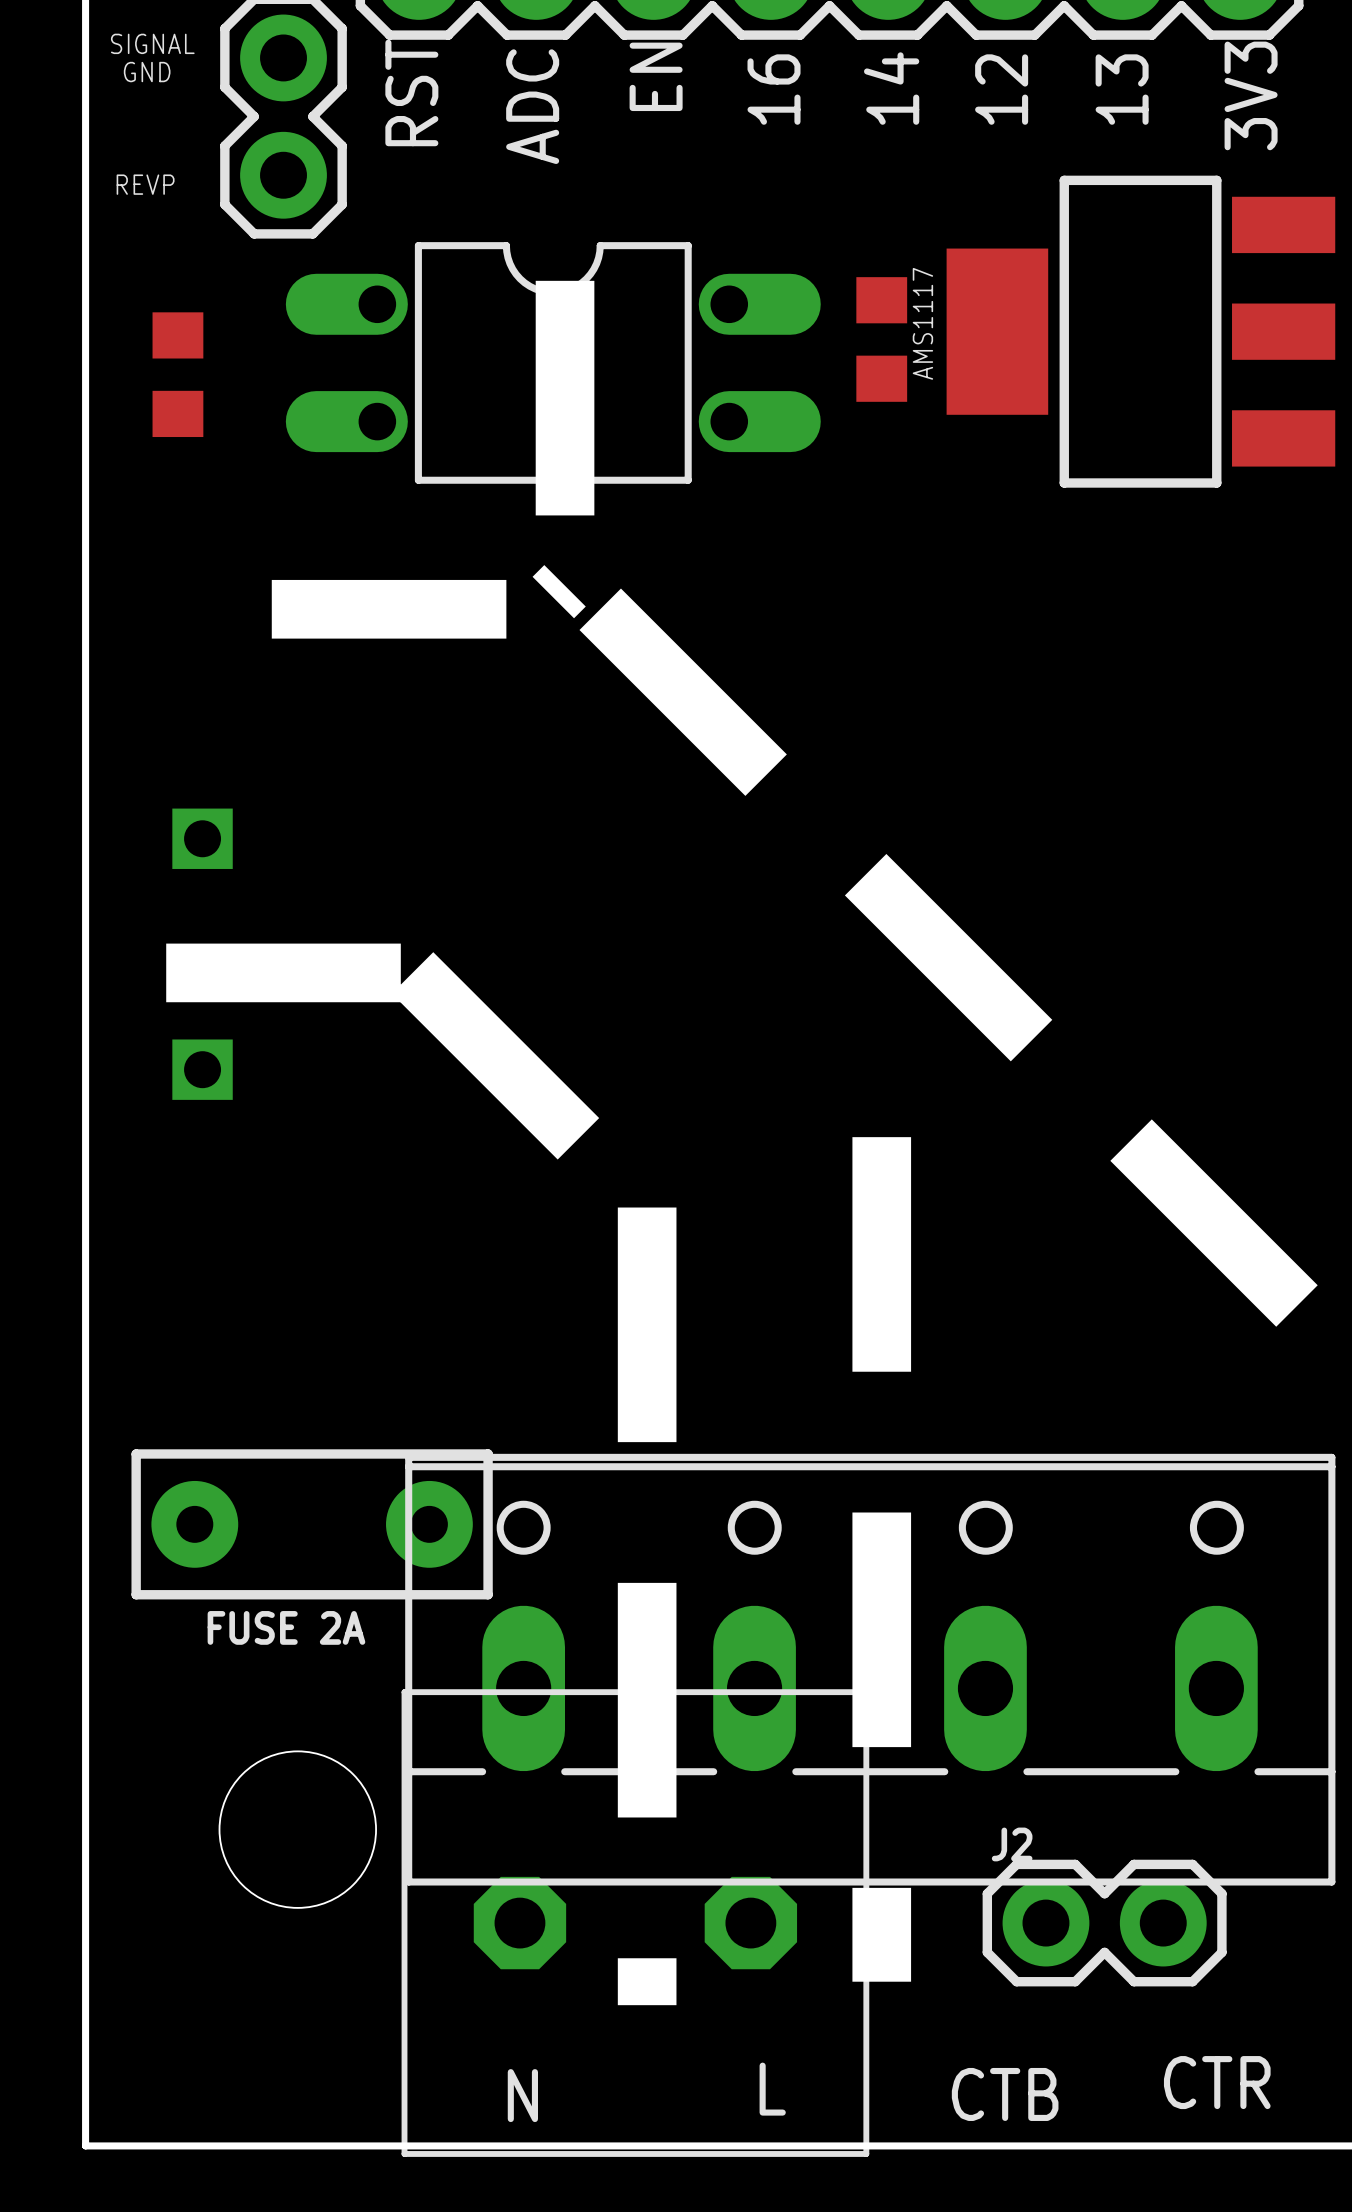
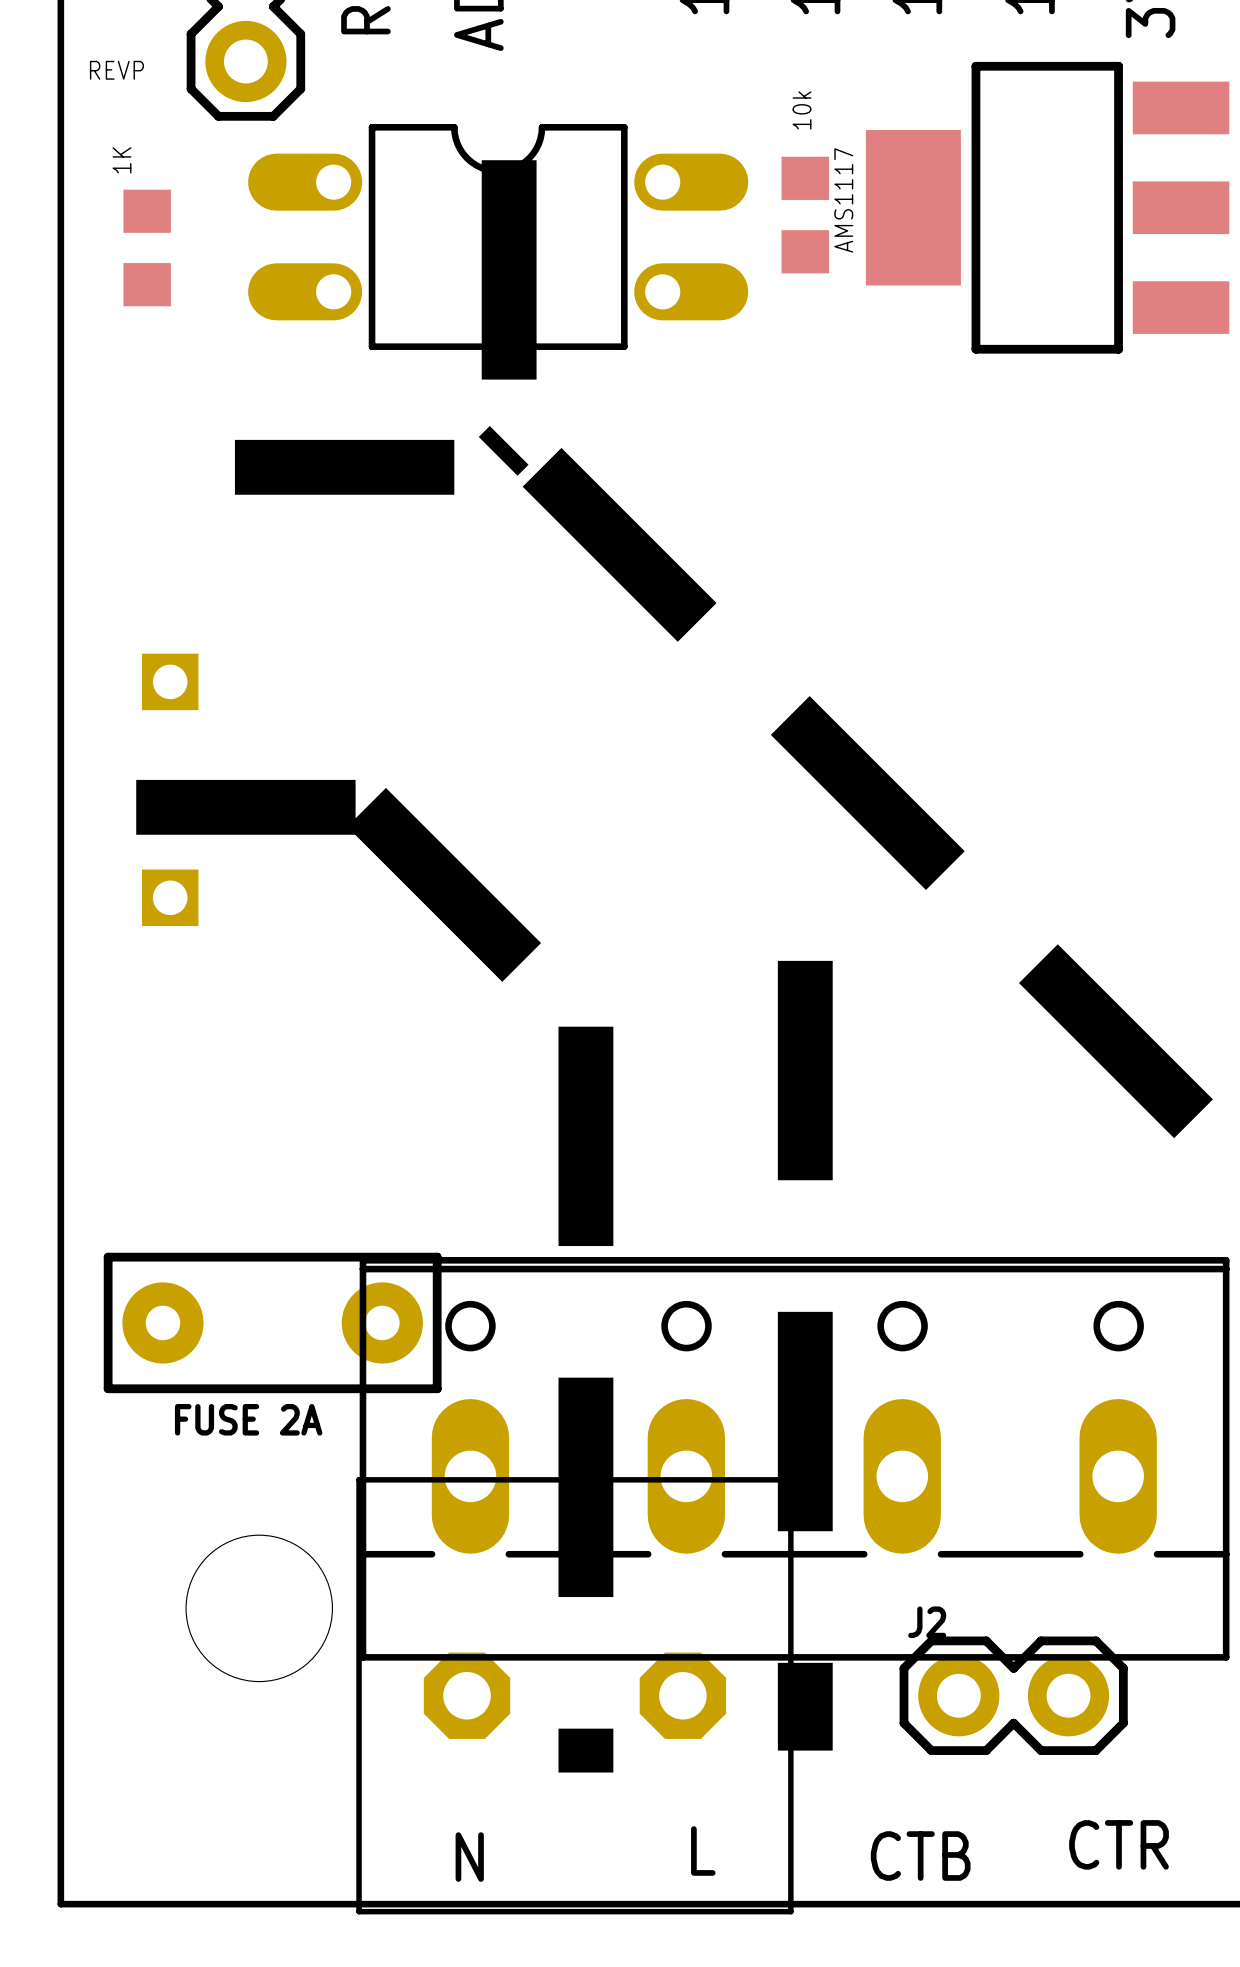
part value: none -> 10k (801, 110)
part value: none -> 1K (121, 160)

